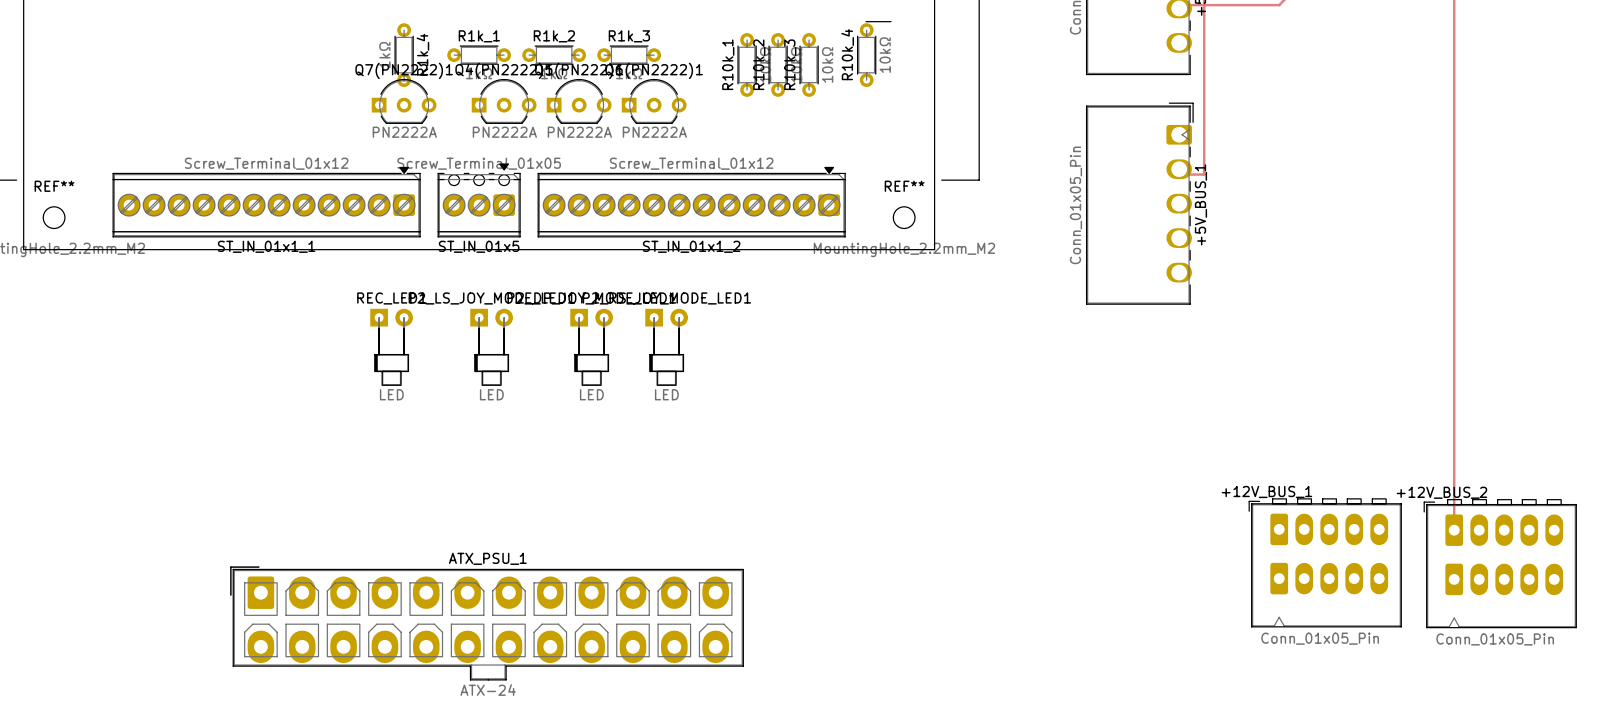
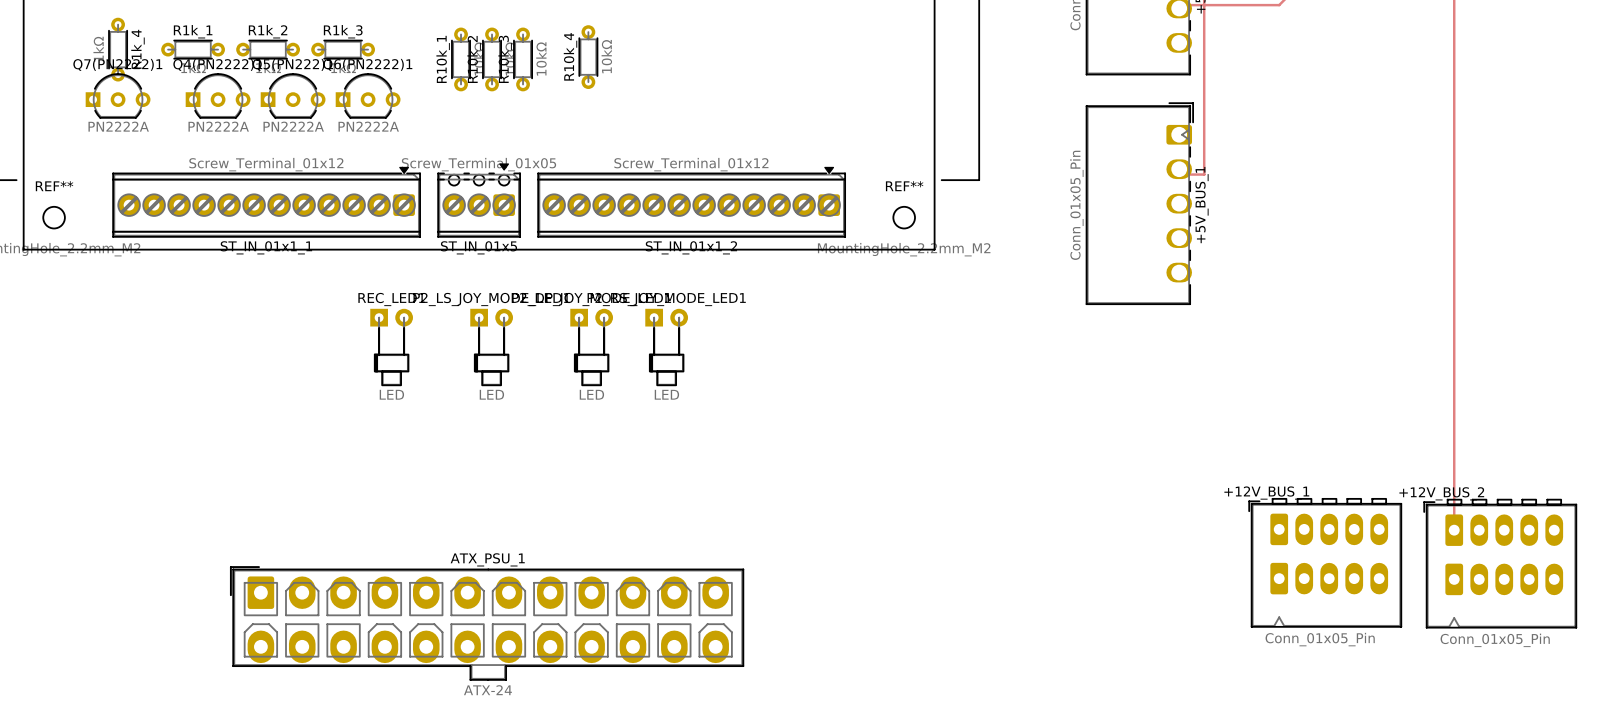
board edge: (865, 21) (890, 21) -> none
R1k_4 position: (404, 55) -> (118, 49)
R1k_1 position: (479, 55) -> (193, 49)
R1k_2 position: (554, 55) -> (268, 49)
R1k_3 position: (629, 55) -> (343, 49)
R10k_4 position: (866, 55) -> (588, 57)
R10k_1 position: (747, 64) -> (461, 59)
R10k_2 position: (778, 64) -> (492, 59)
R10k_3 position: (809, 64) -> (523, 59)
Q7(PN2222)1 position: (404, 101) -> (118, 95)
Q4(PN2222)1 position: (504, 101) -> (218, 95)
Q5(PN222)1 position: (579, 101) -> (293, 95)
Q6(PN2222)1 position: (654, 101) -> (368, 95)

